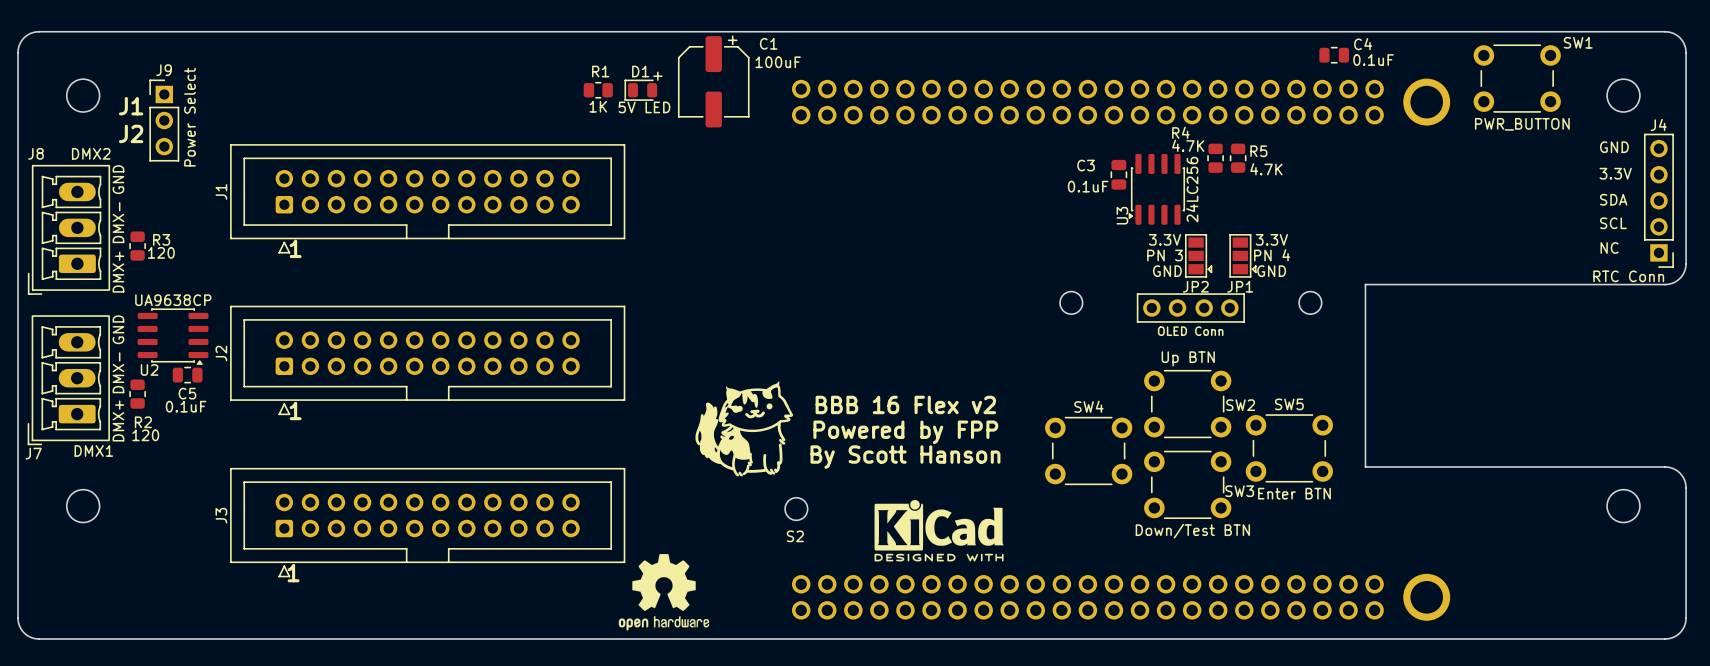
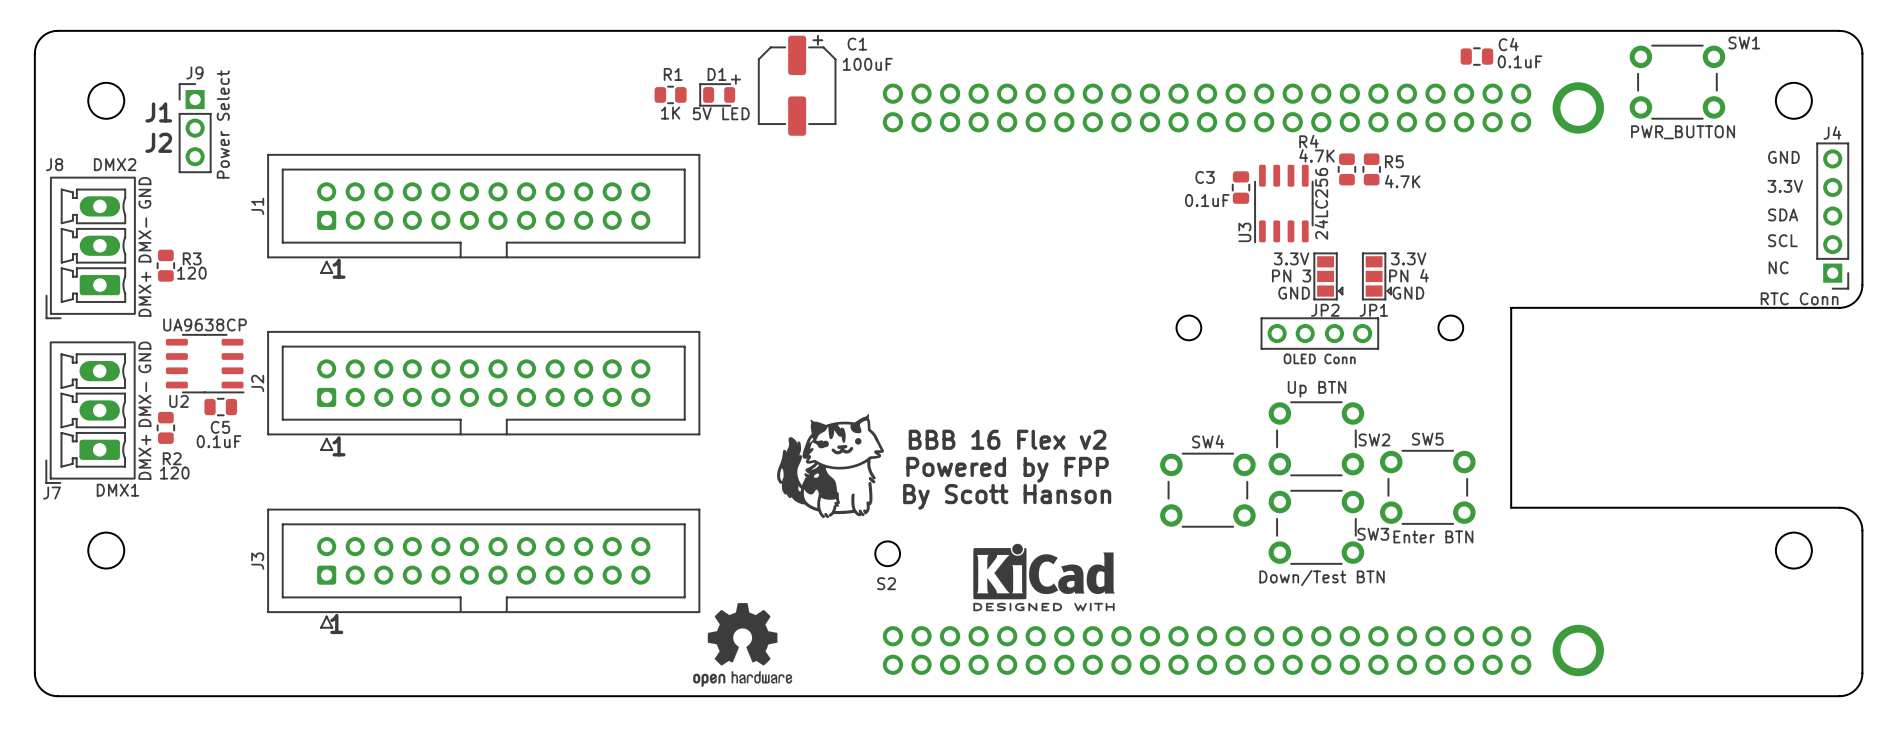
U3 footprint: [1128, 153, 1185, 225] -> [1254, 164, 1314, 244]
U2 footprint: [137, 308, 209, 365] -> [165, 334, 245, 394]

